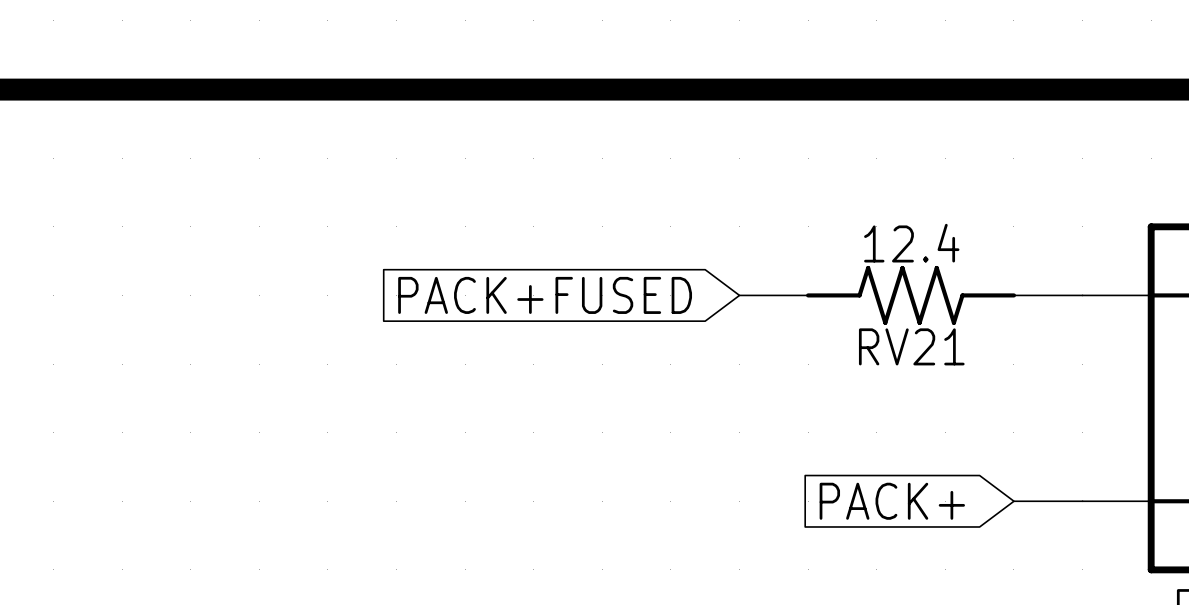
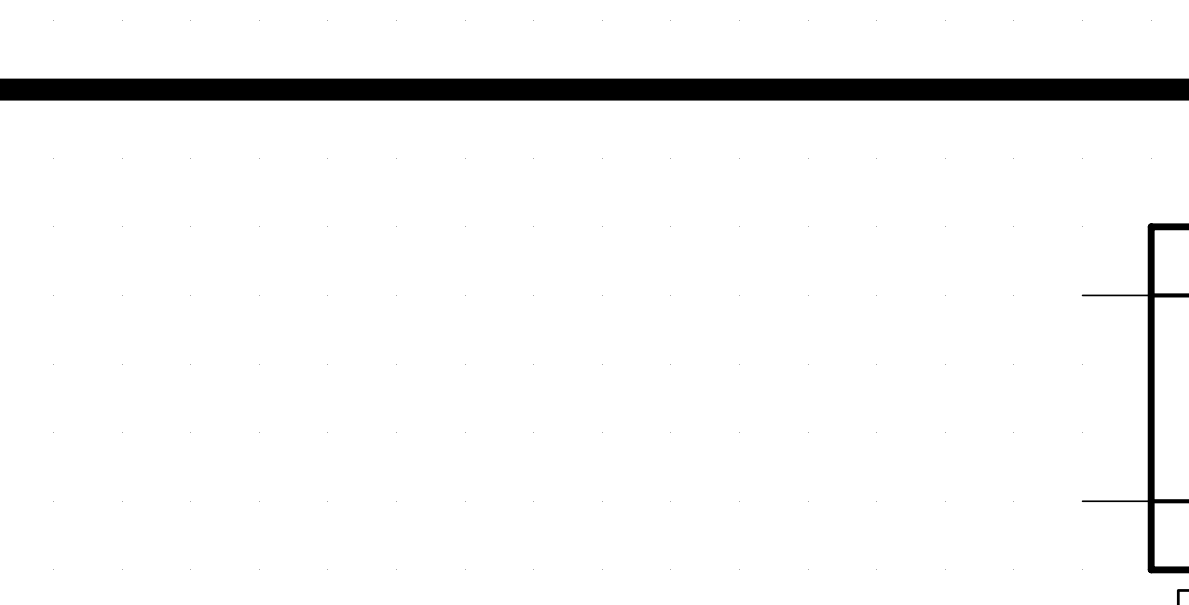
global label: PACK+FUSED (545, 295) -> none
wire: (739, 295) (808, 295) -> none
RV21: 12.4 (911, 295) -> none
wire: (1013, 295) (1082, 295) -> none
global label: PACK+ (892, 501) -> none
wire: (1013, 501) (1082, 501) -> none

